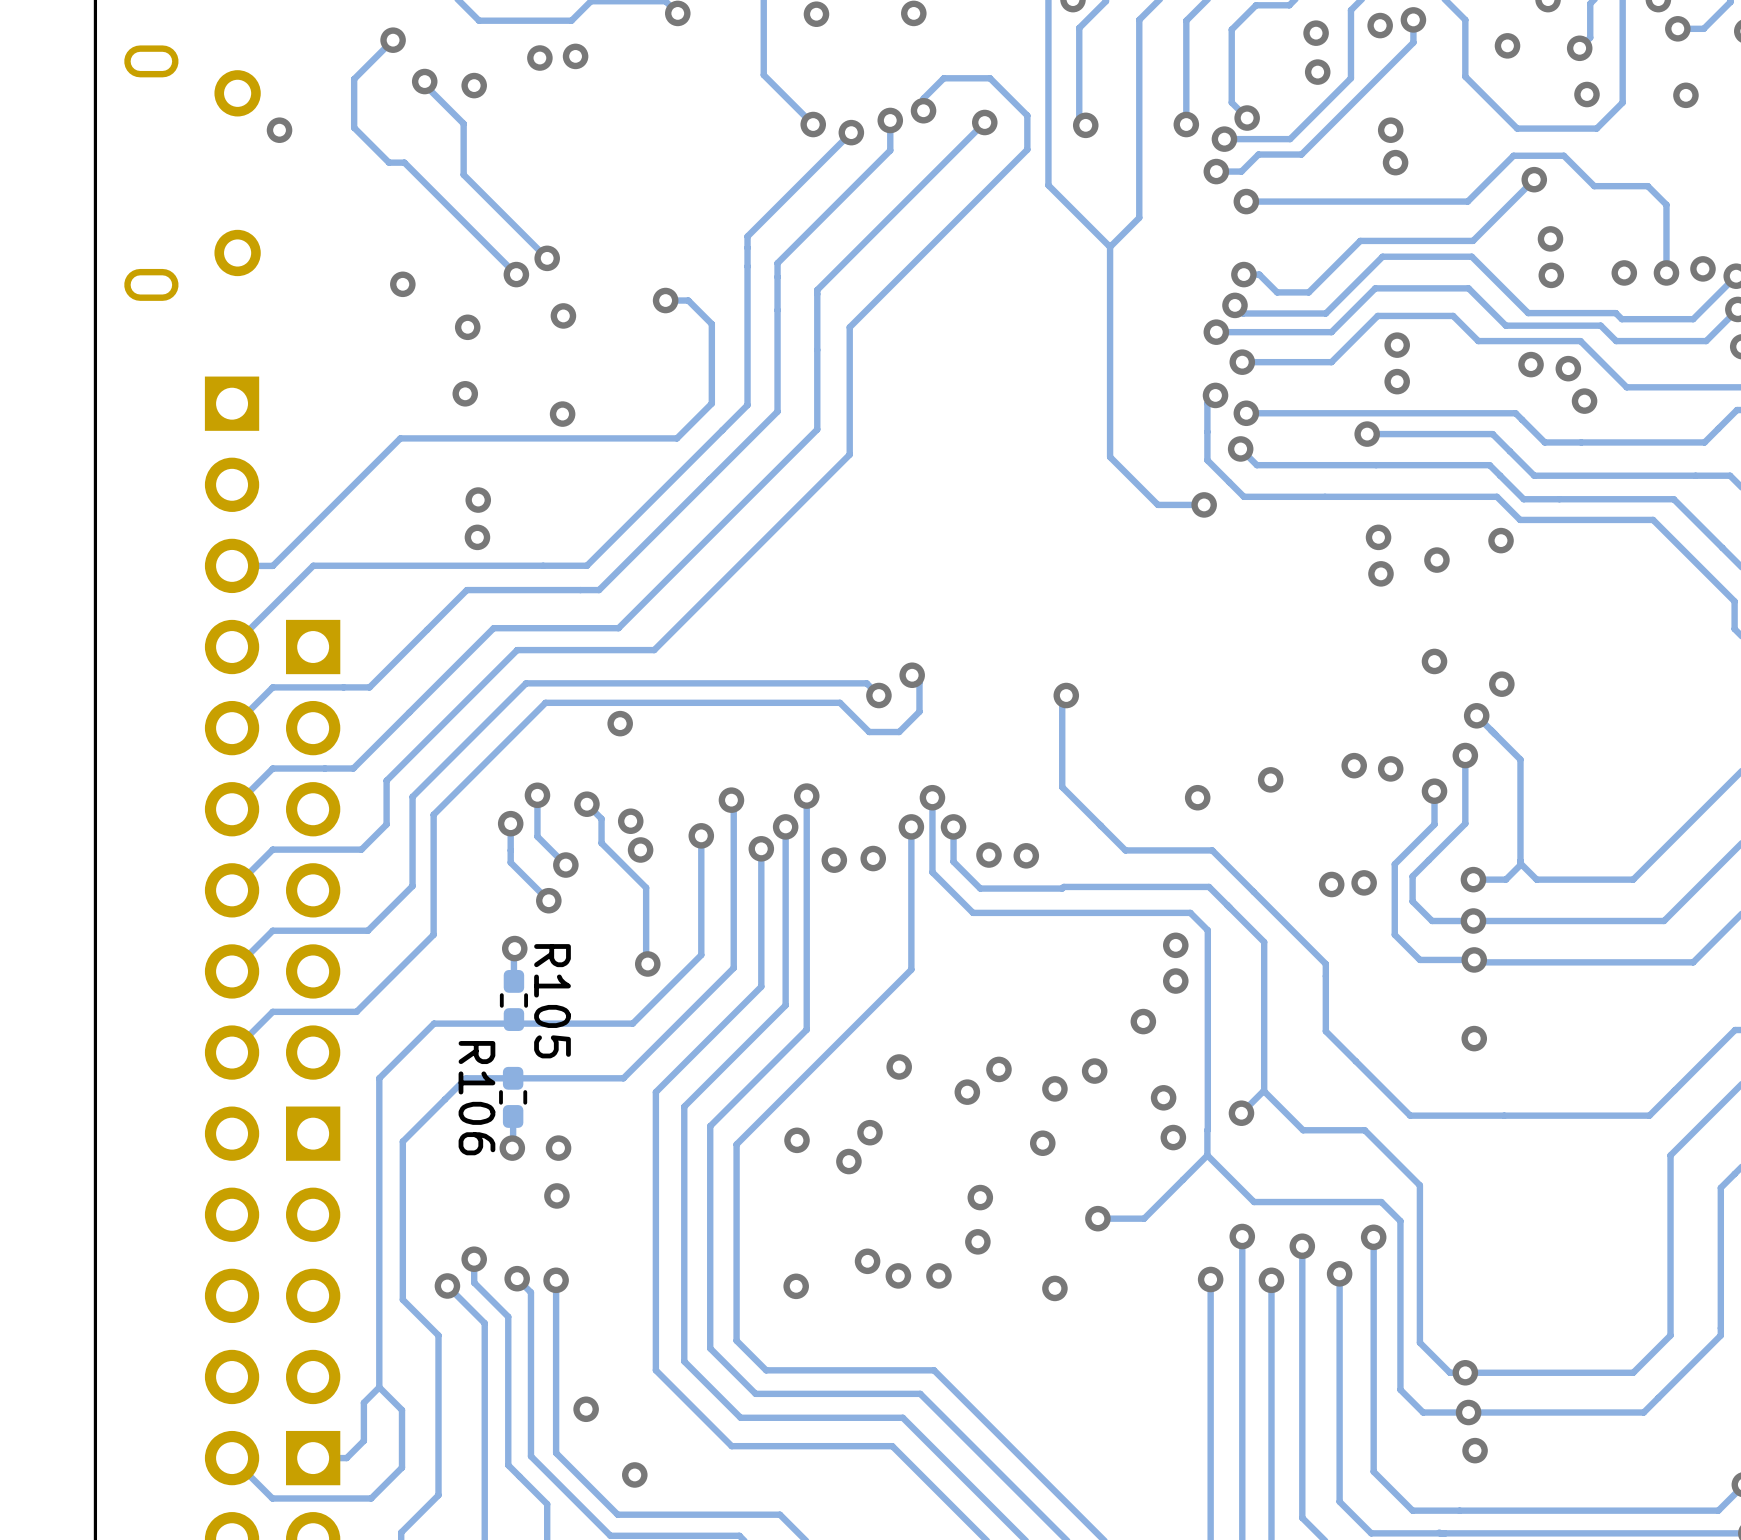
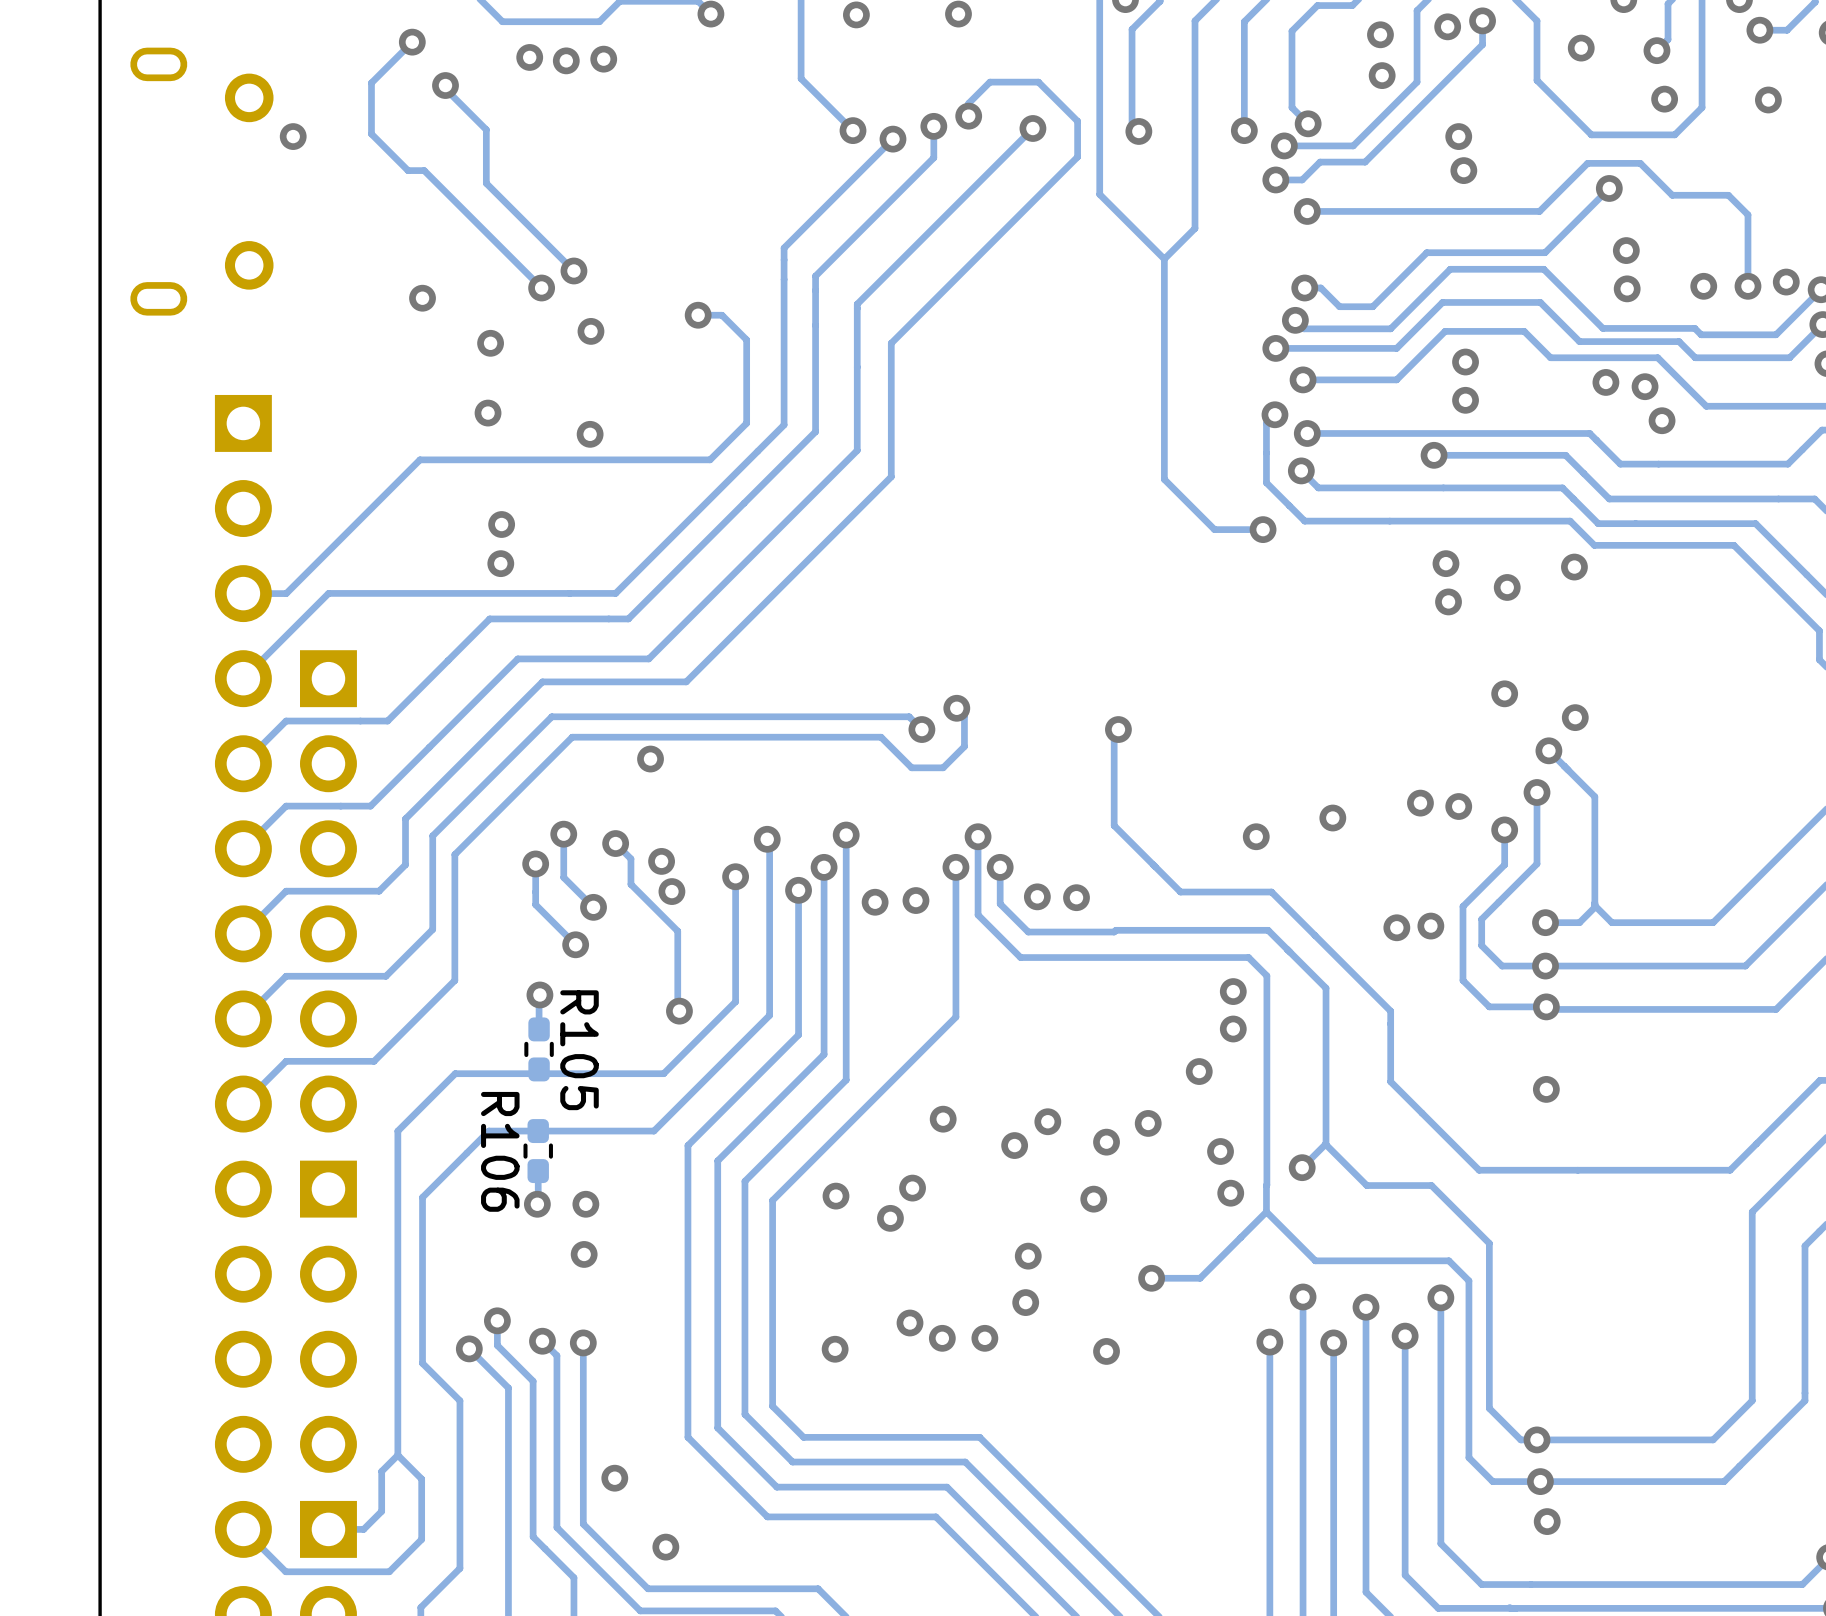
via position: (474, 85) -> (529, 57)

